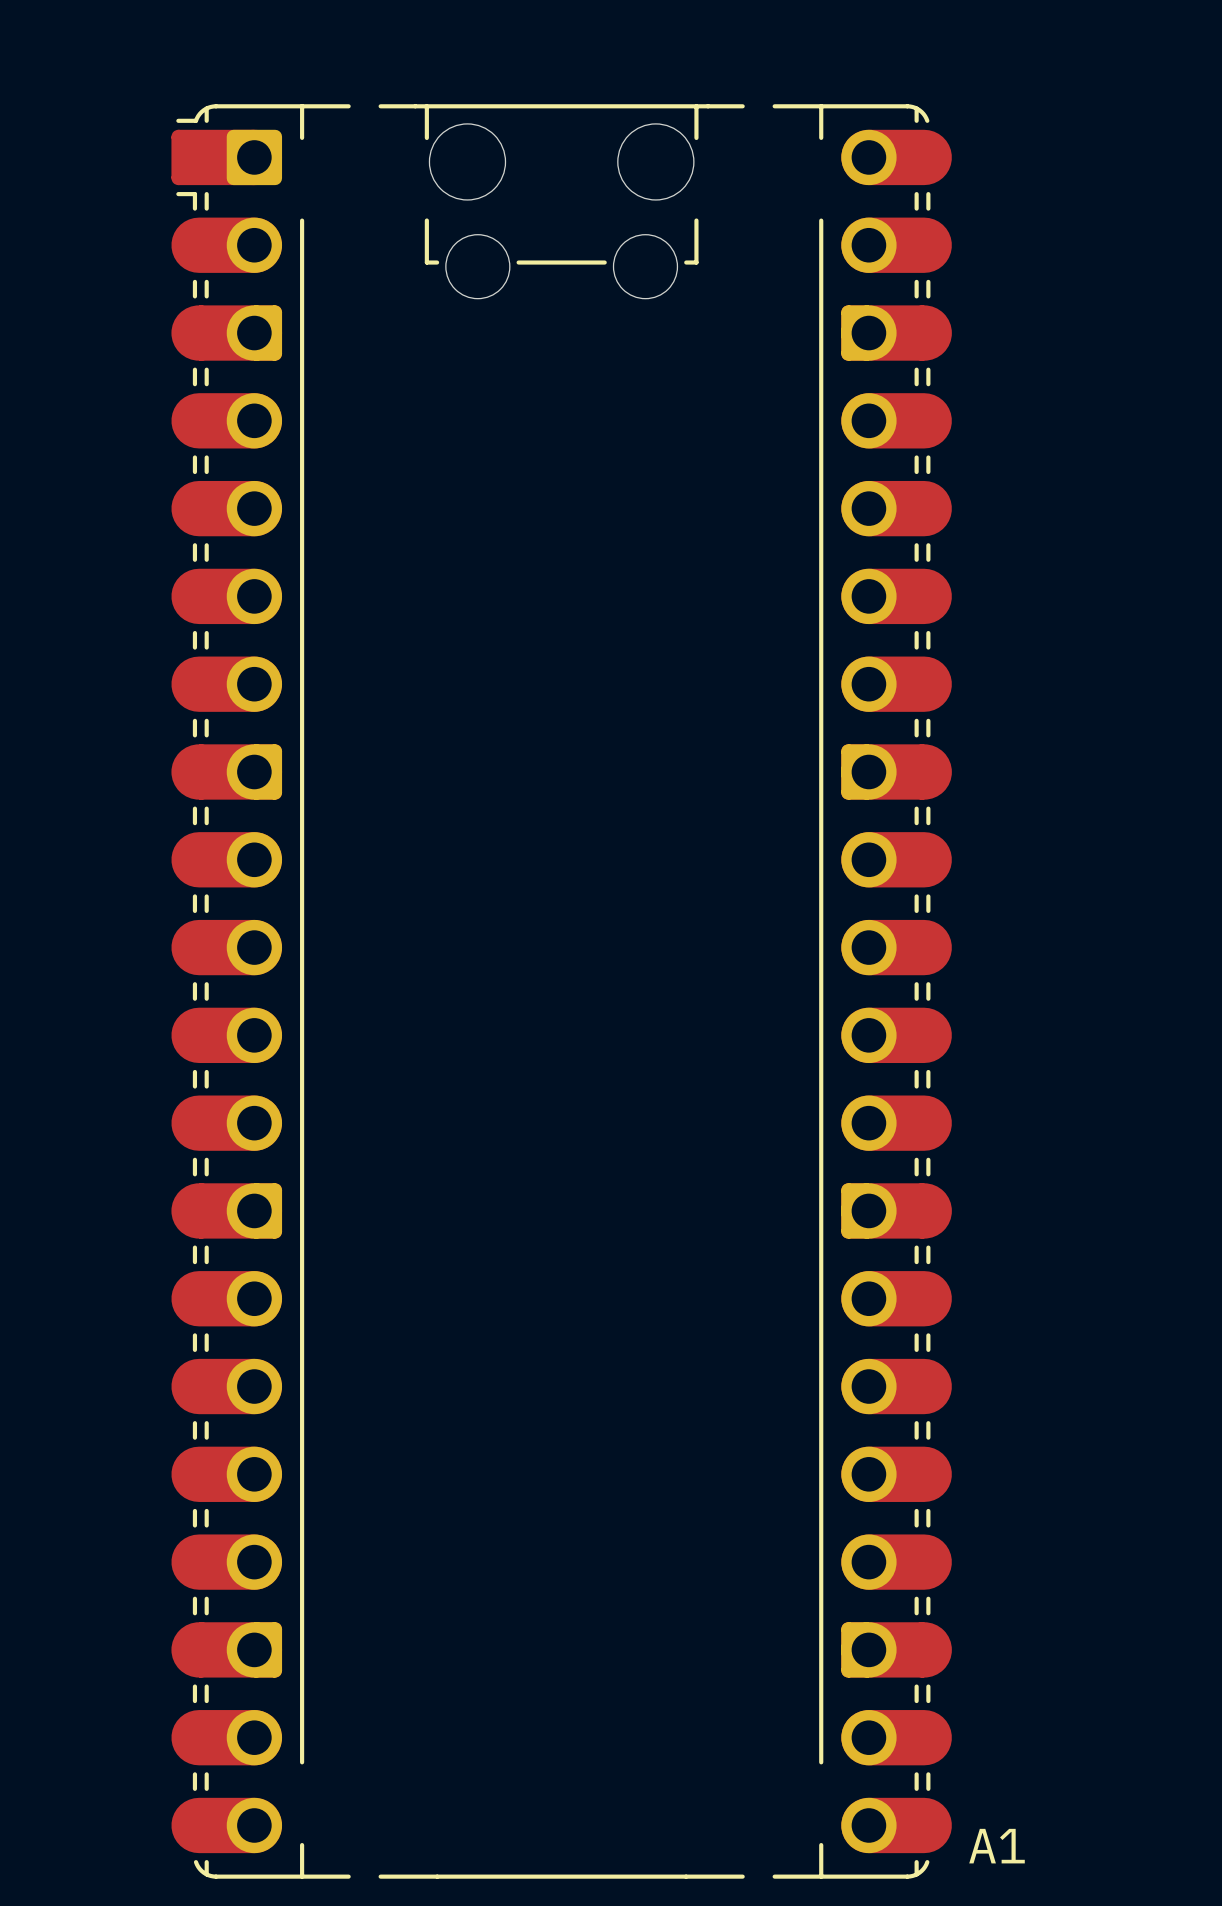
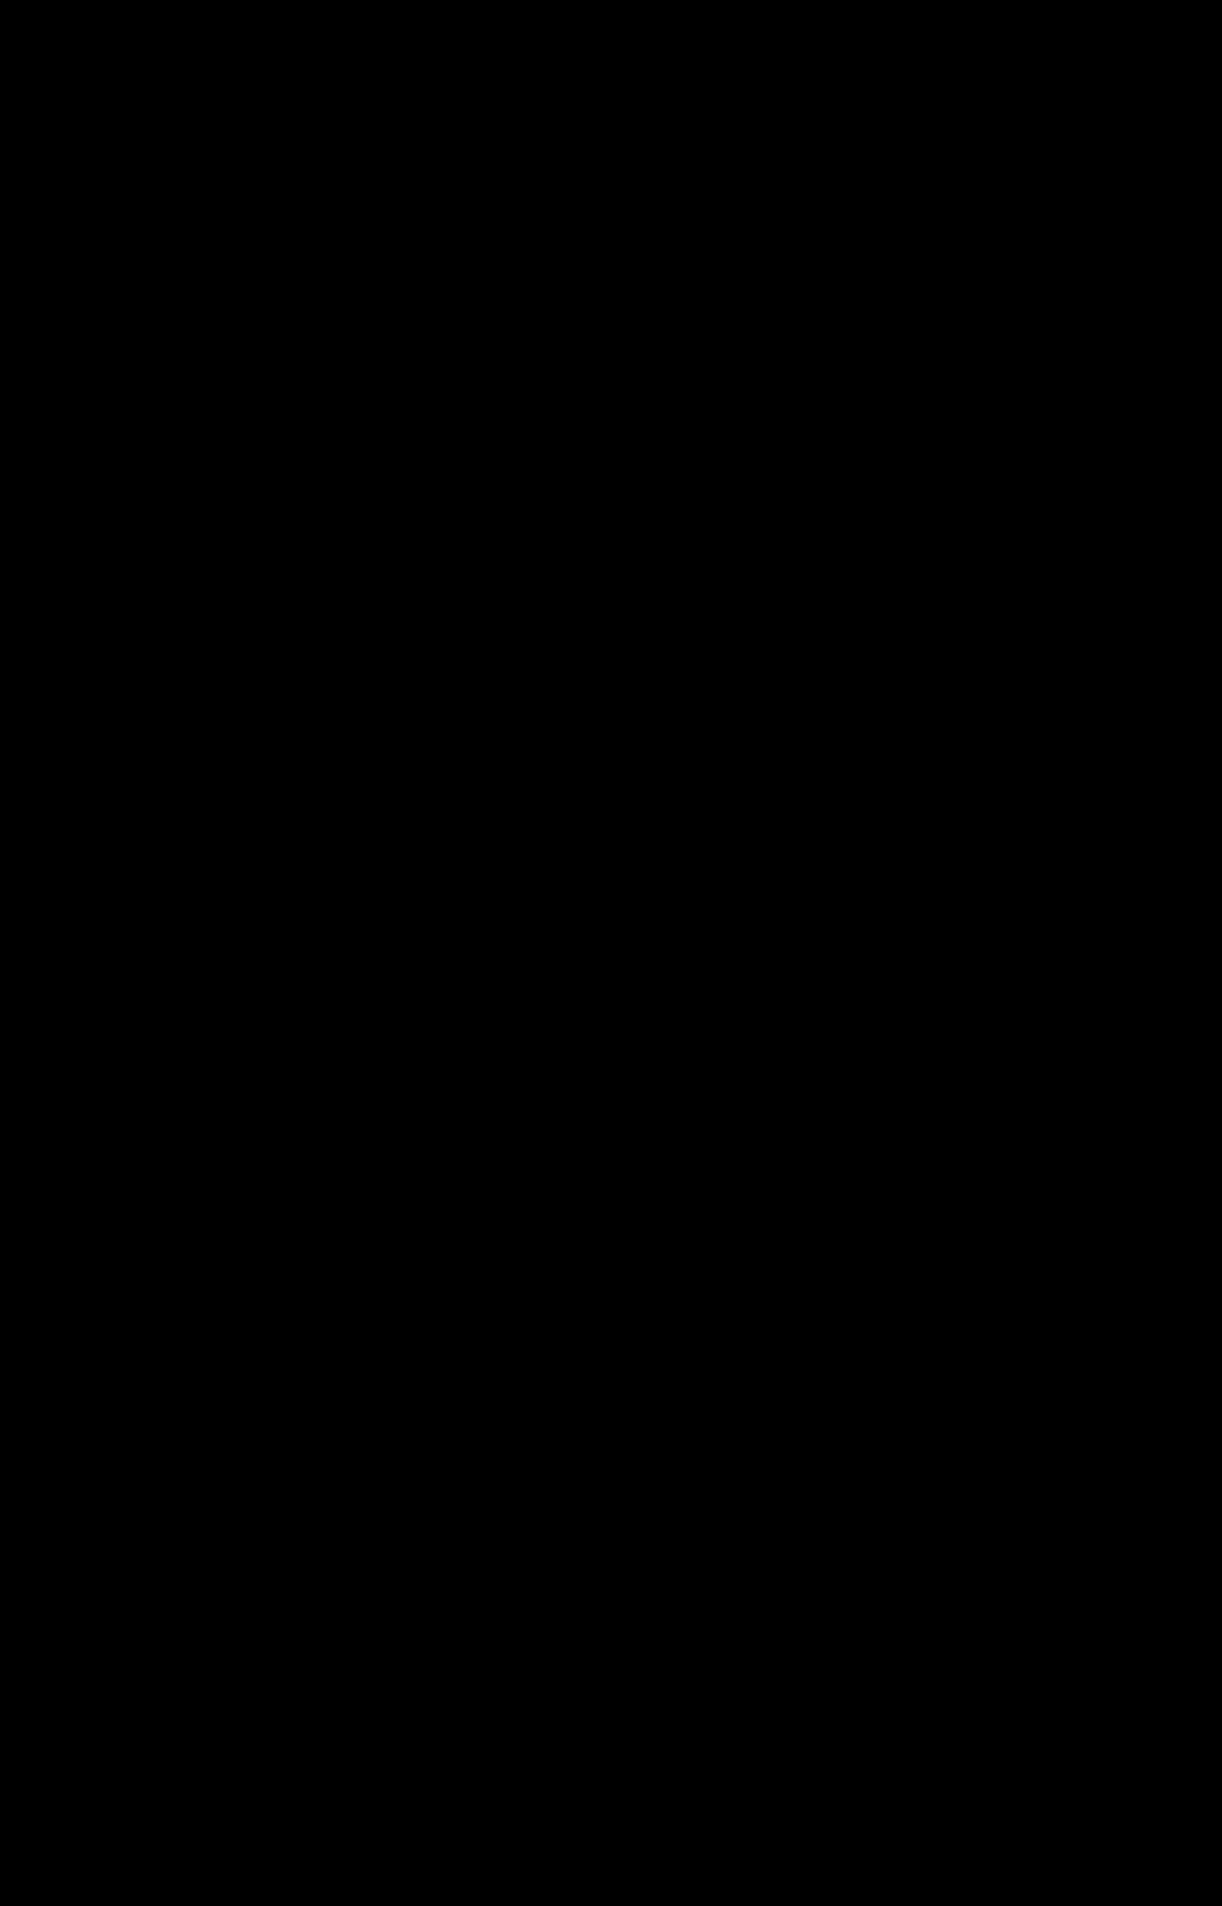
A1: (561, 991) -> none

